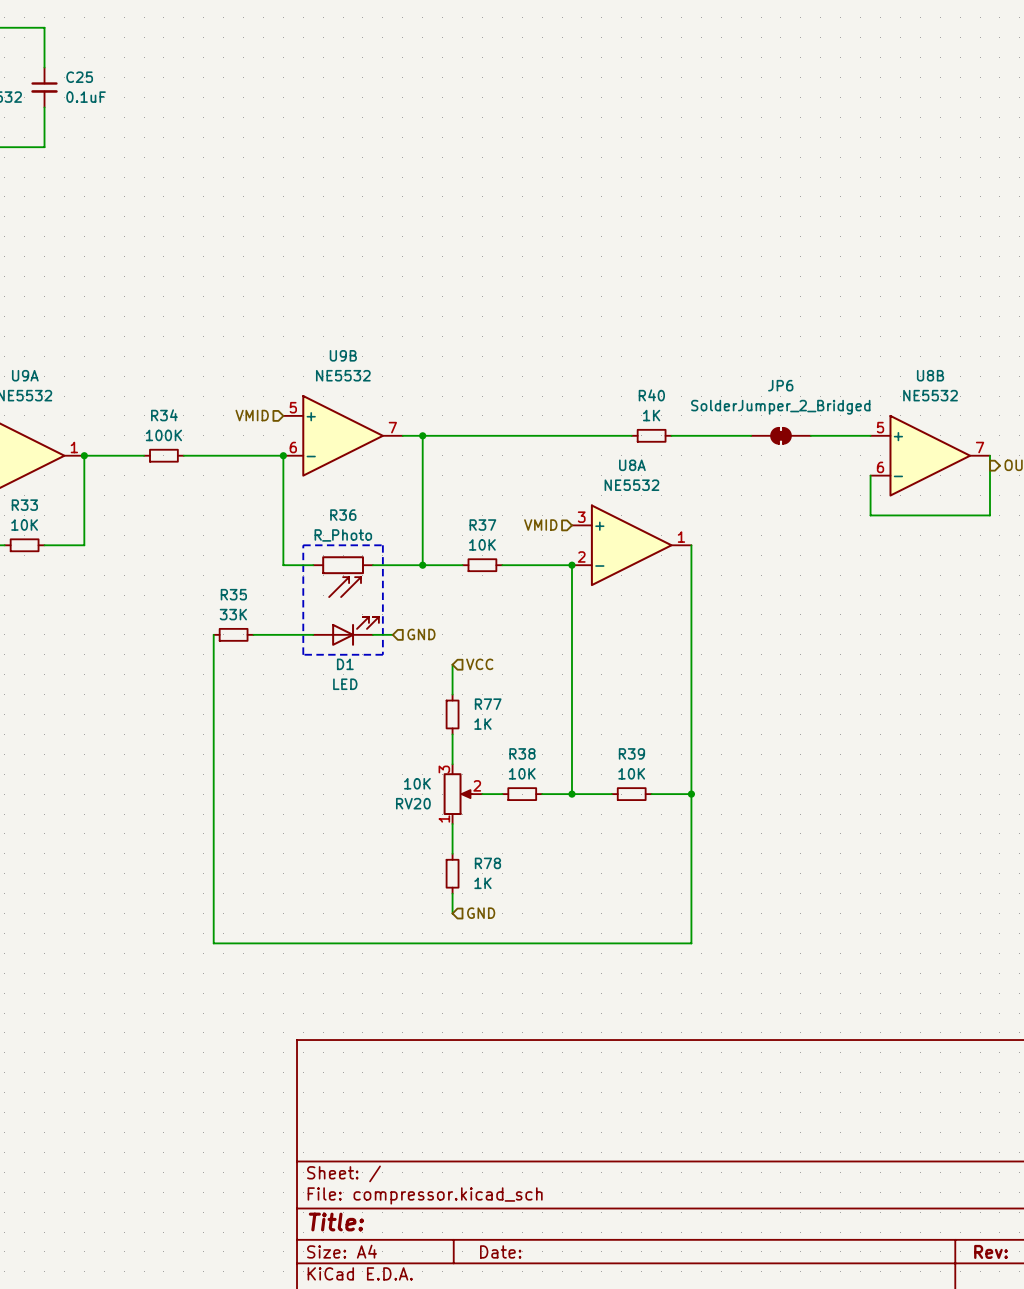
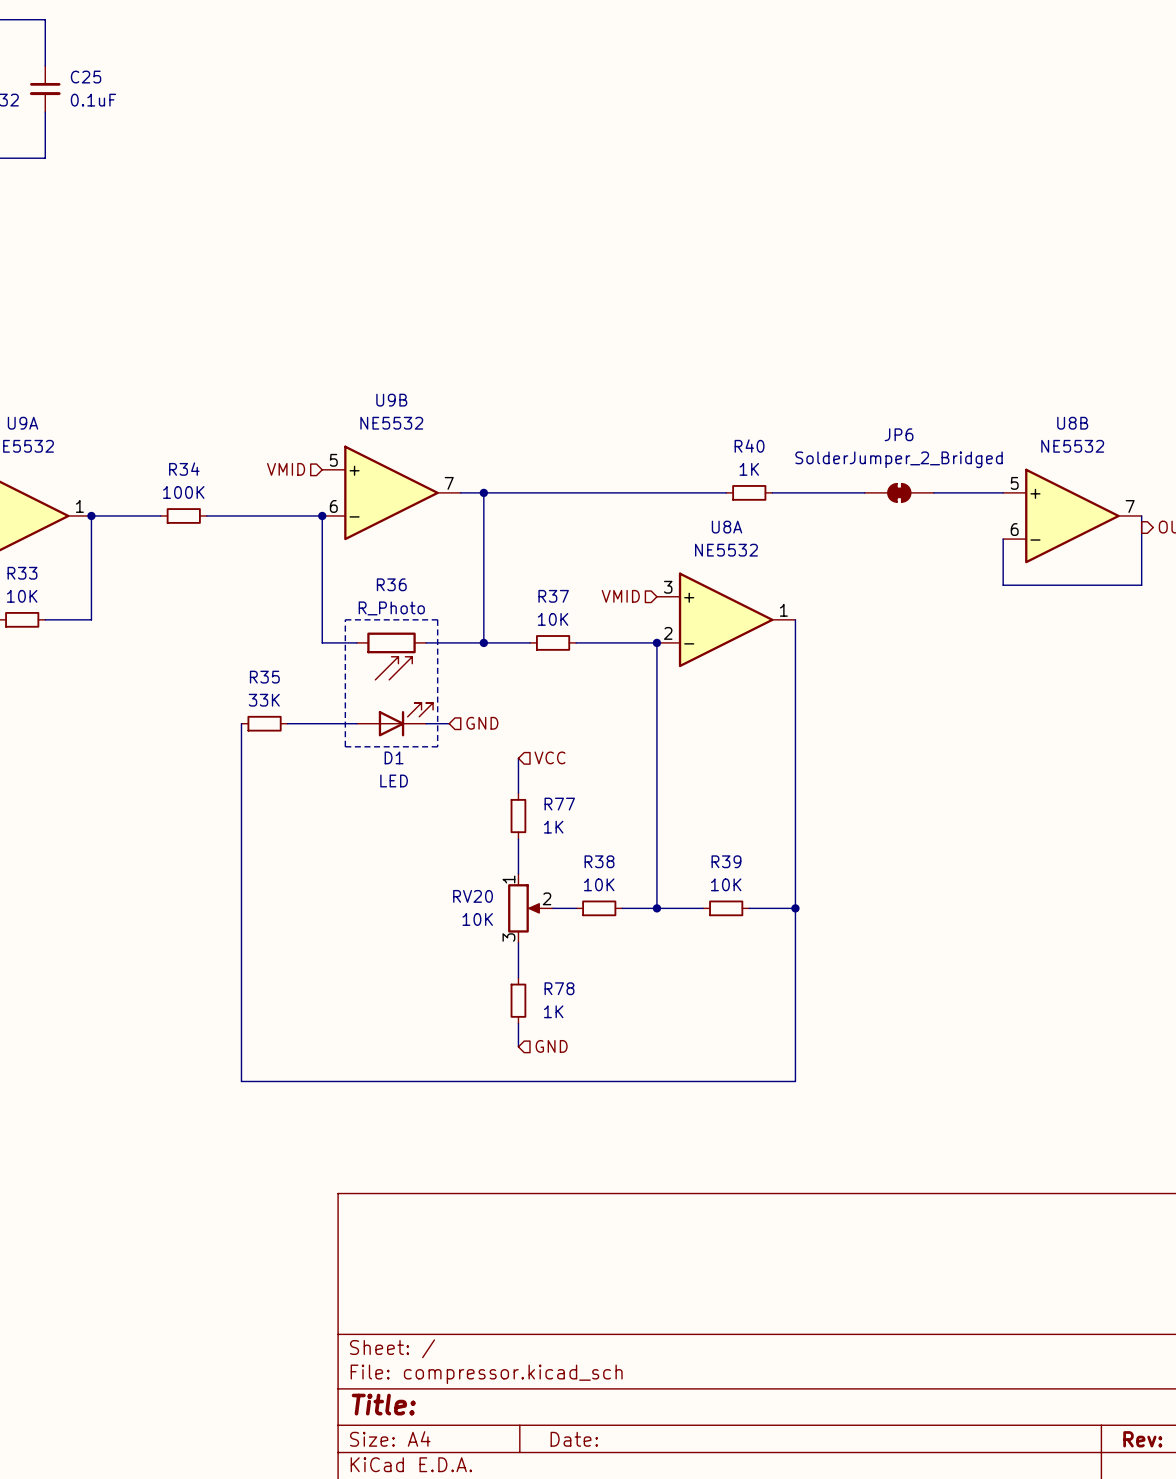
RV20 flip: as is (458, 794) -> up-down (524, 908)

